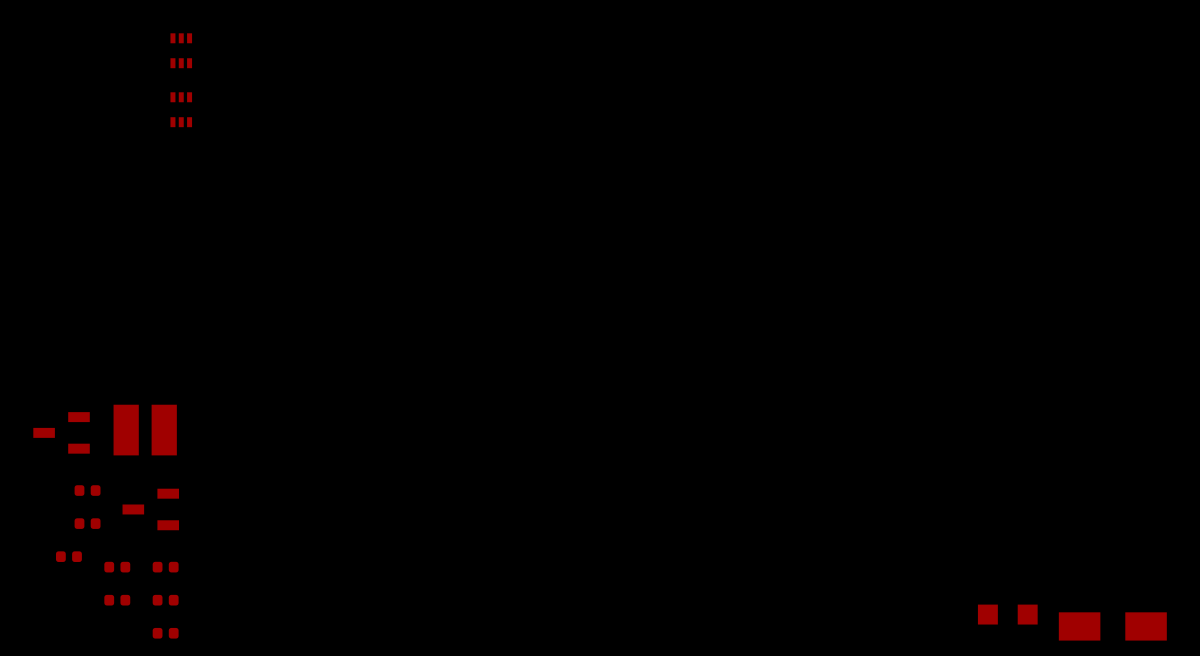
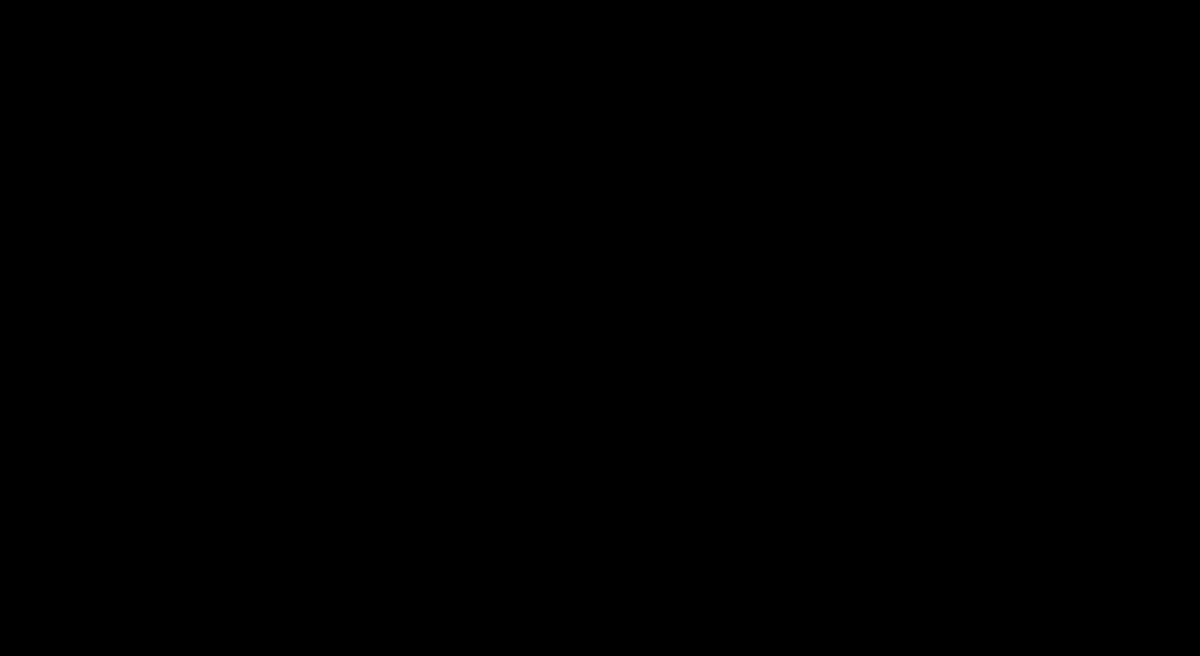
part: (181, 50) -> none
part: (181, 109) -> none
part: (145, 430) -> none
part: (61, 432) -> none
part: (87, 490) -> none
part: (150, 509) -> none
part: (87, 523) -> none
part: (68, 556) -> none
part: (117, 567) -> none
part: (165, 567) -> none
part: (117, 600) -> none
part: (165, 600) -> none
part: (1007, 614) -> none
part: (1112, 626) -> none
part: (165, 633) -> none

